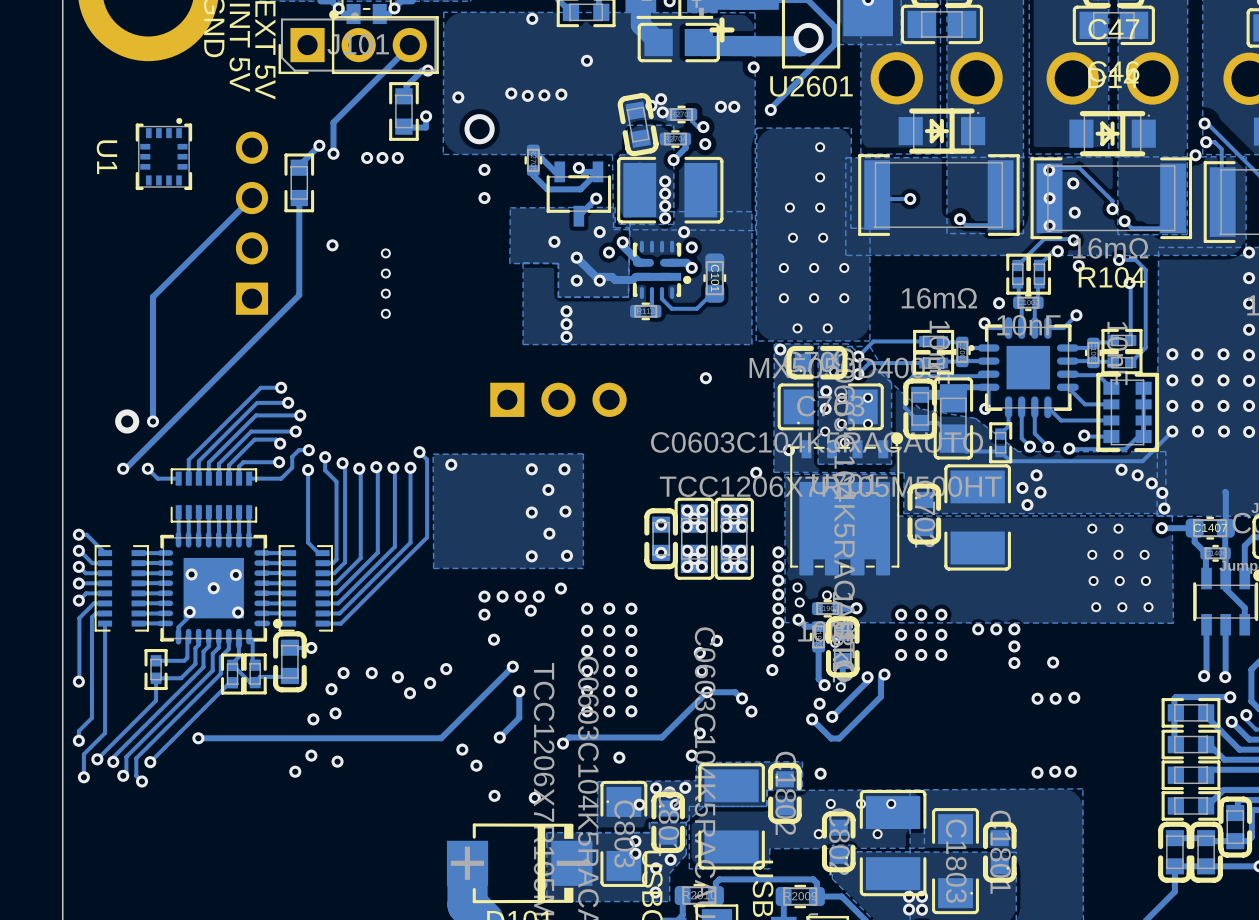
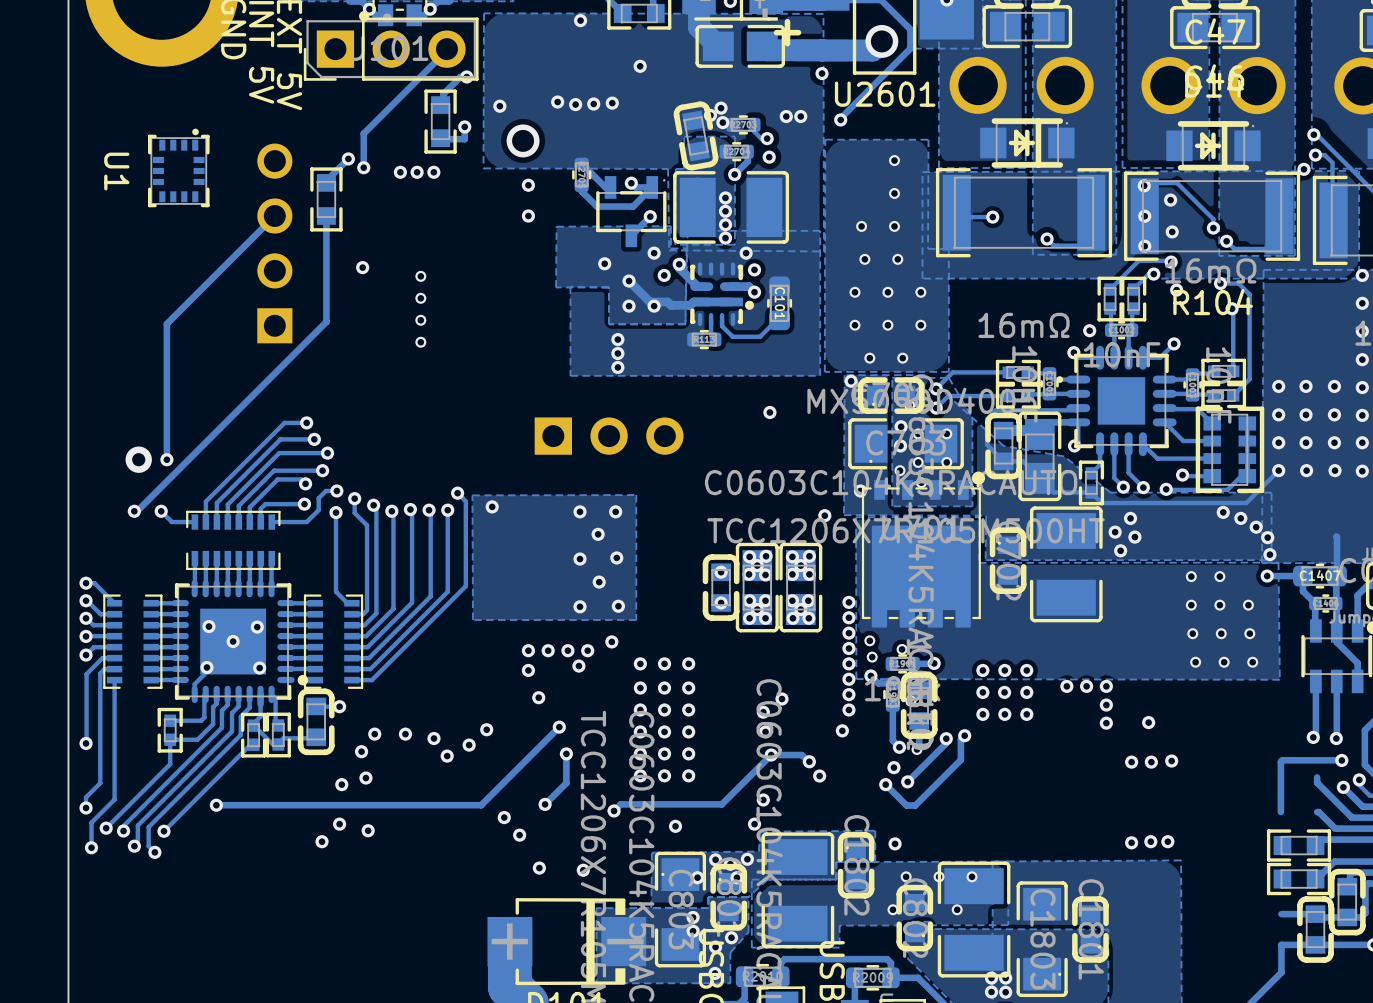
part: (1191, 712) -> none
part: (1191, 744) -> none
part: (1174, 852) -> none

